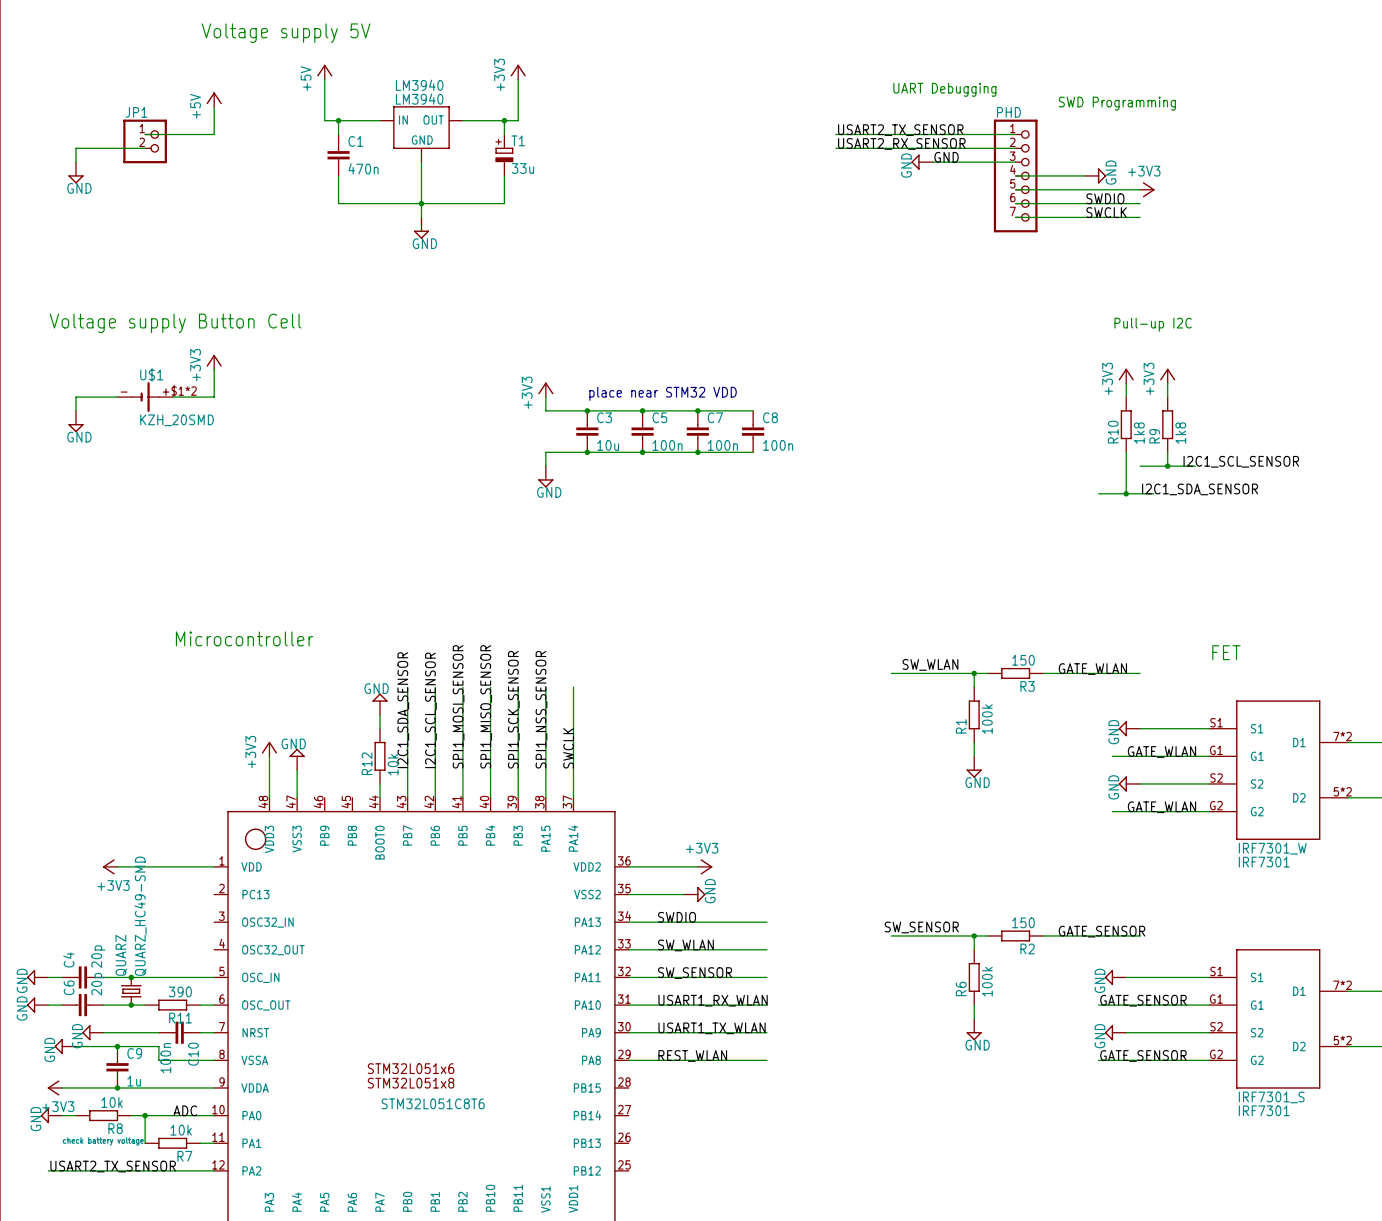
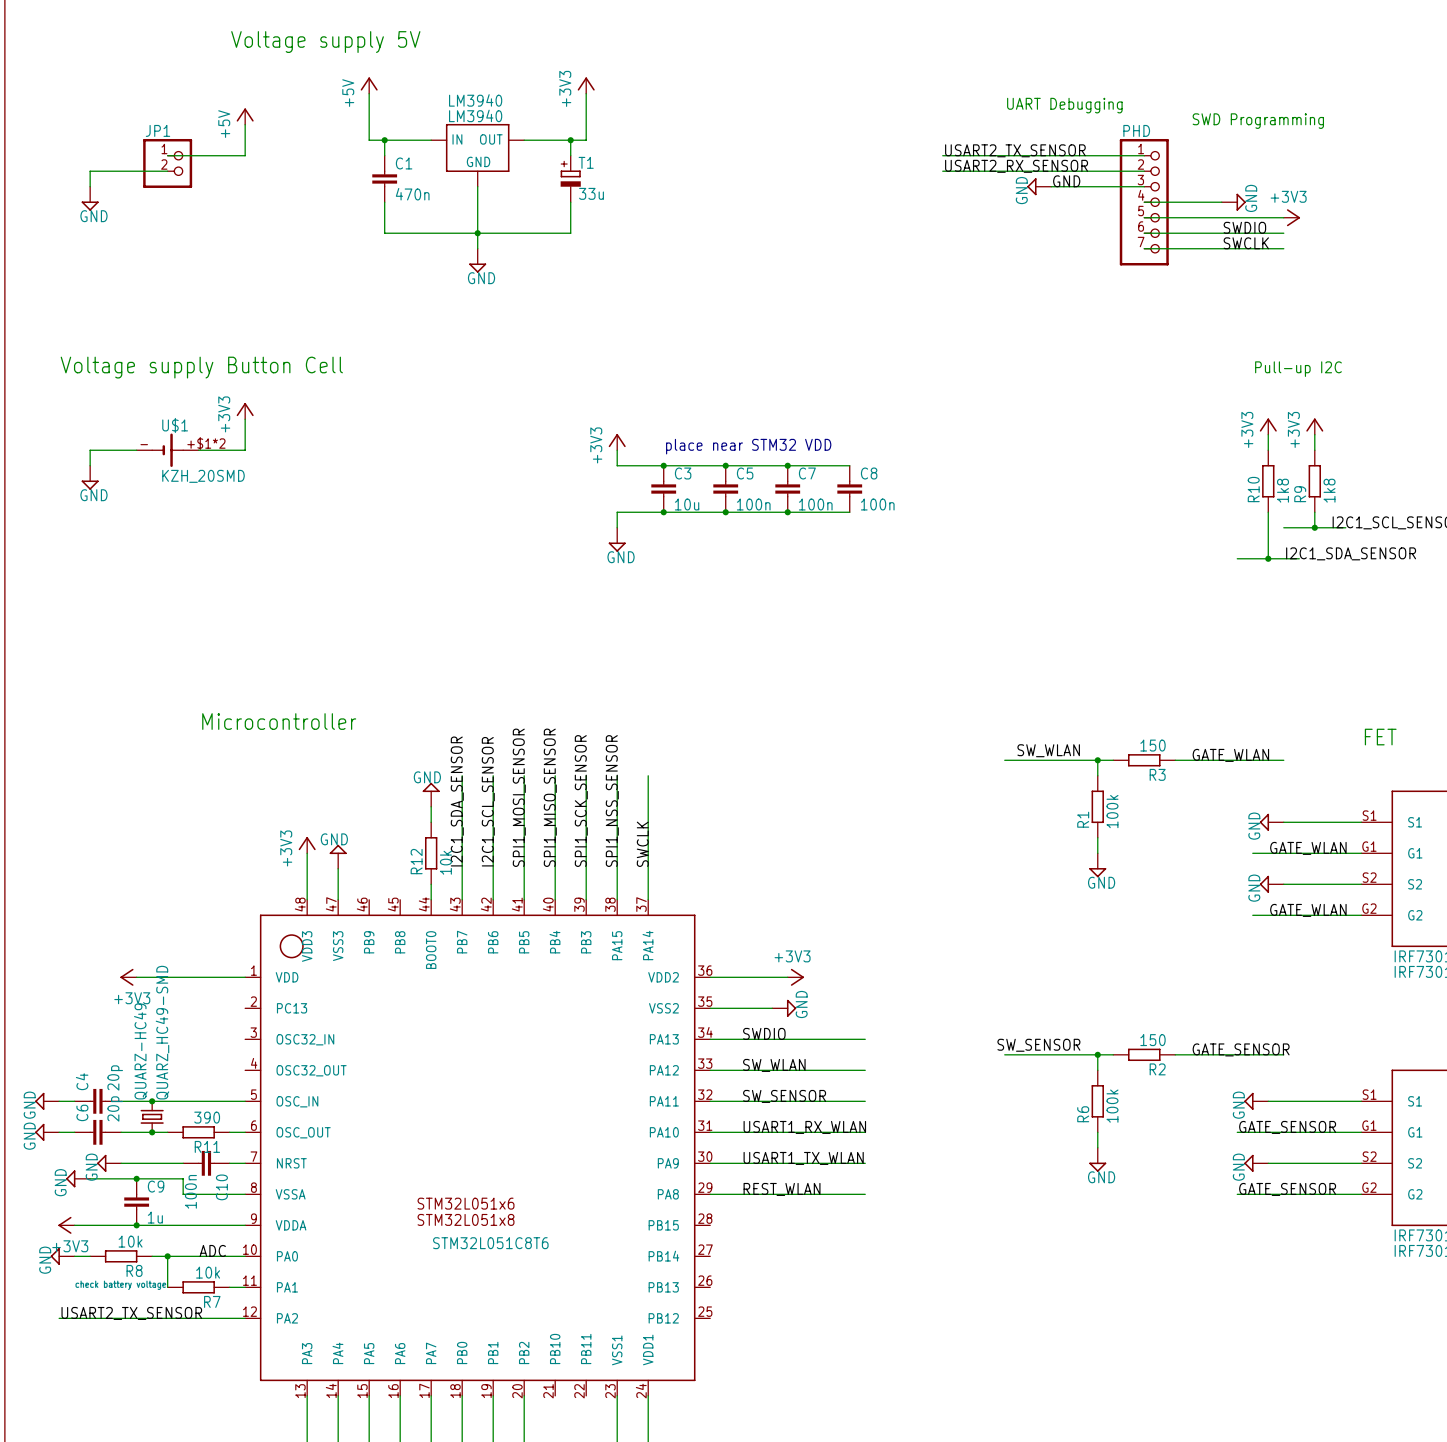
QUARZ name: QUARZ (121, 955) -> QUARZ-HC49 (140, 1051)

